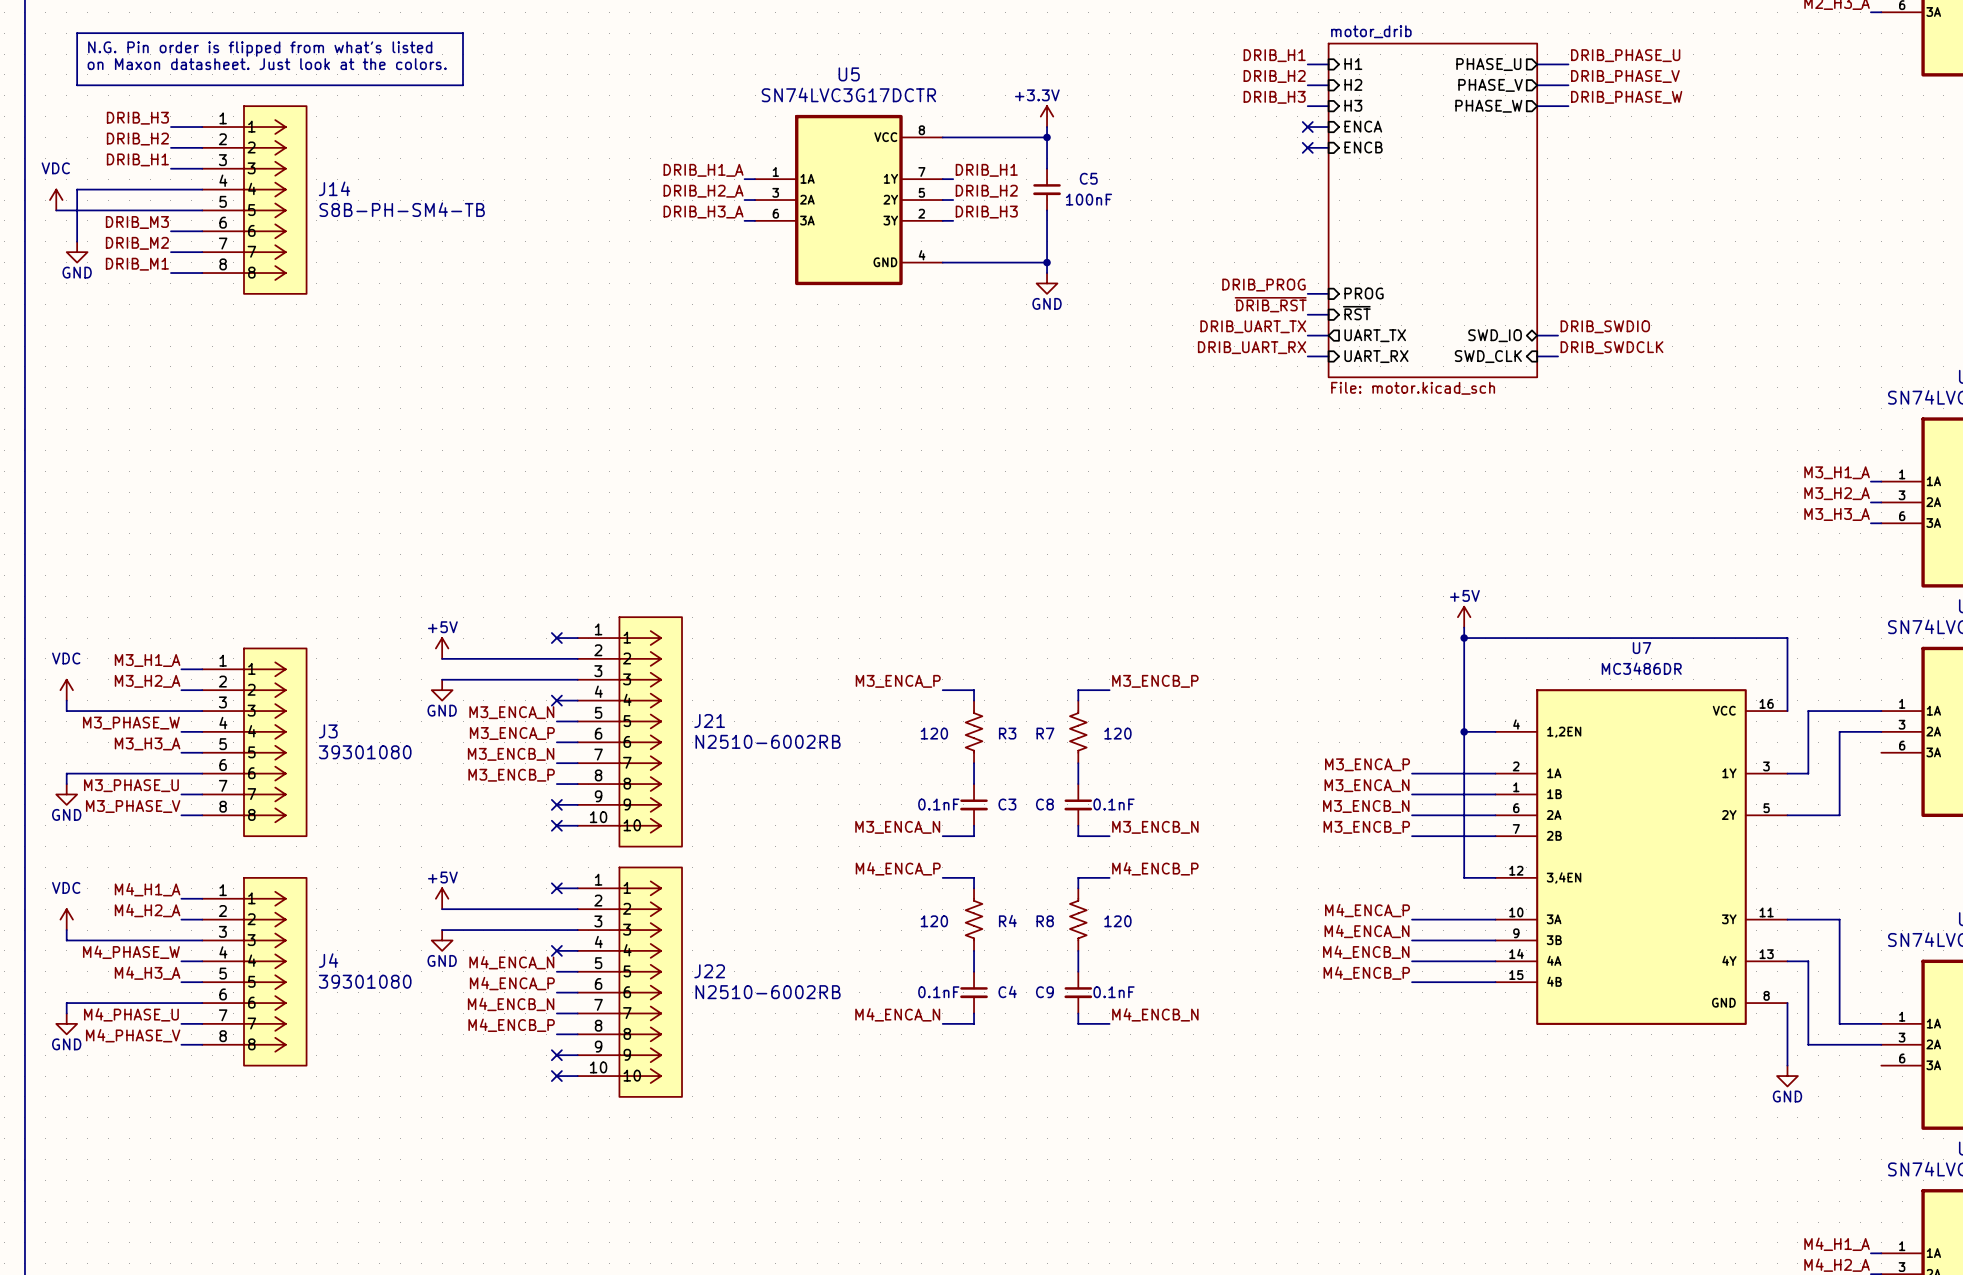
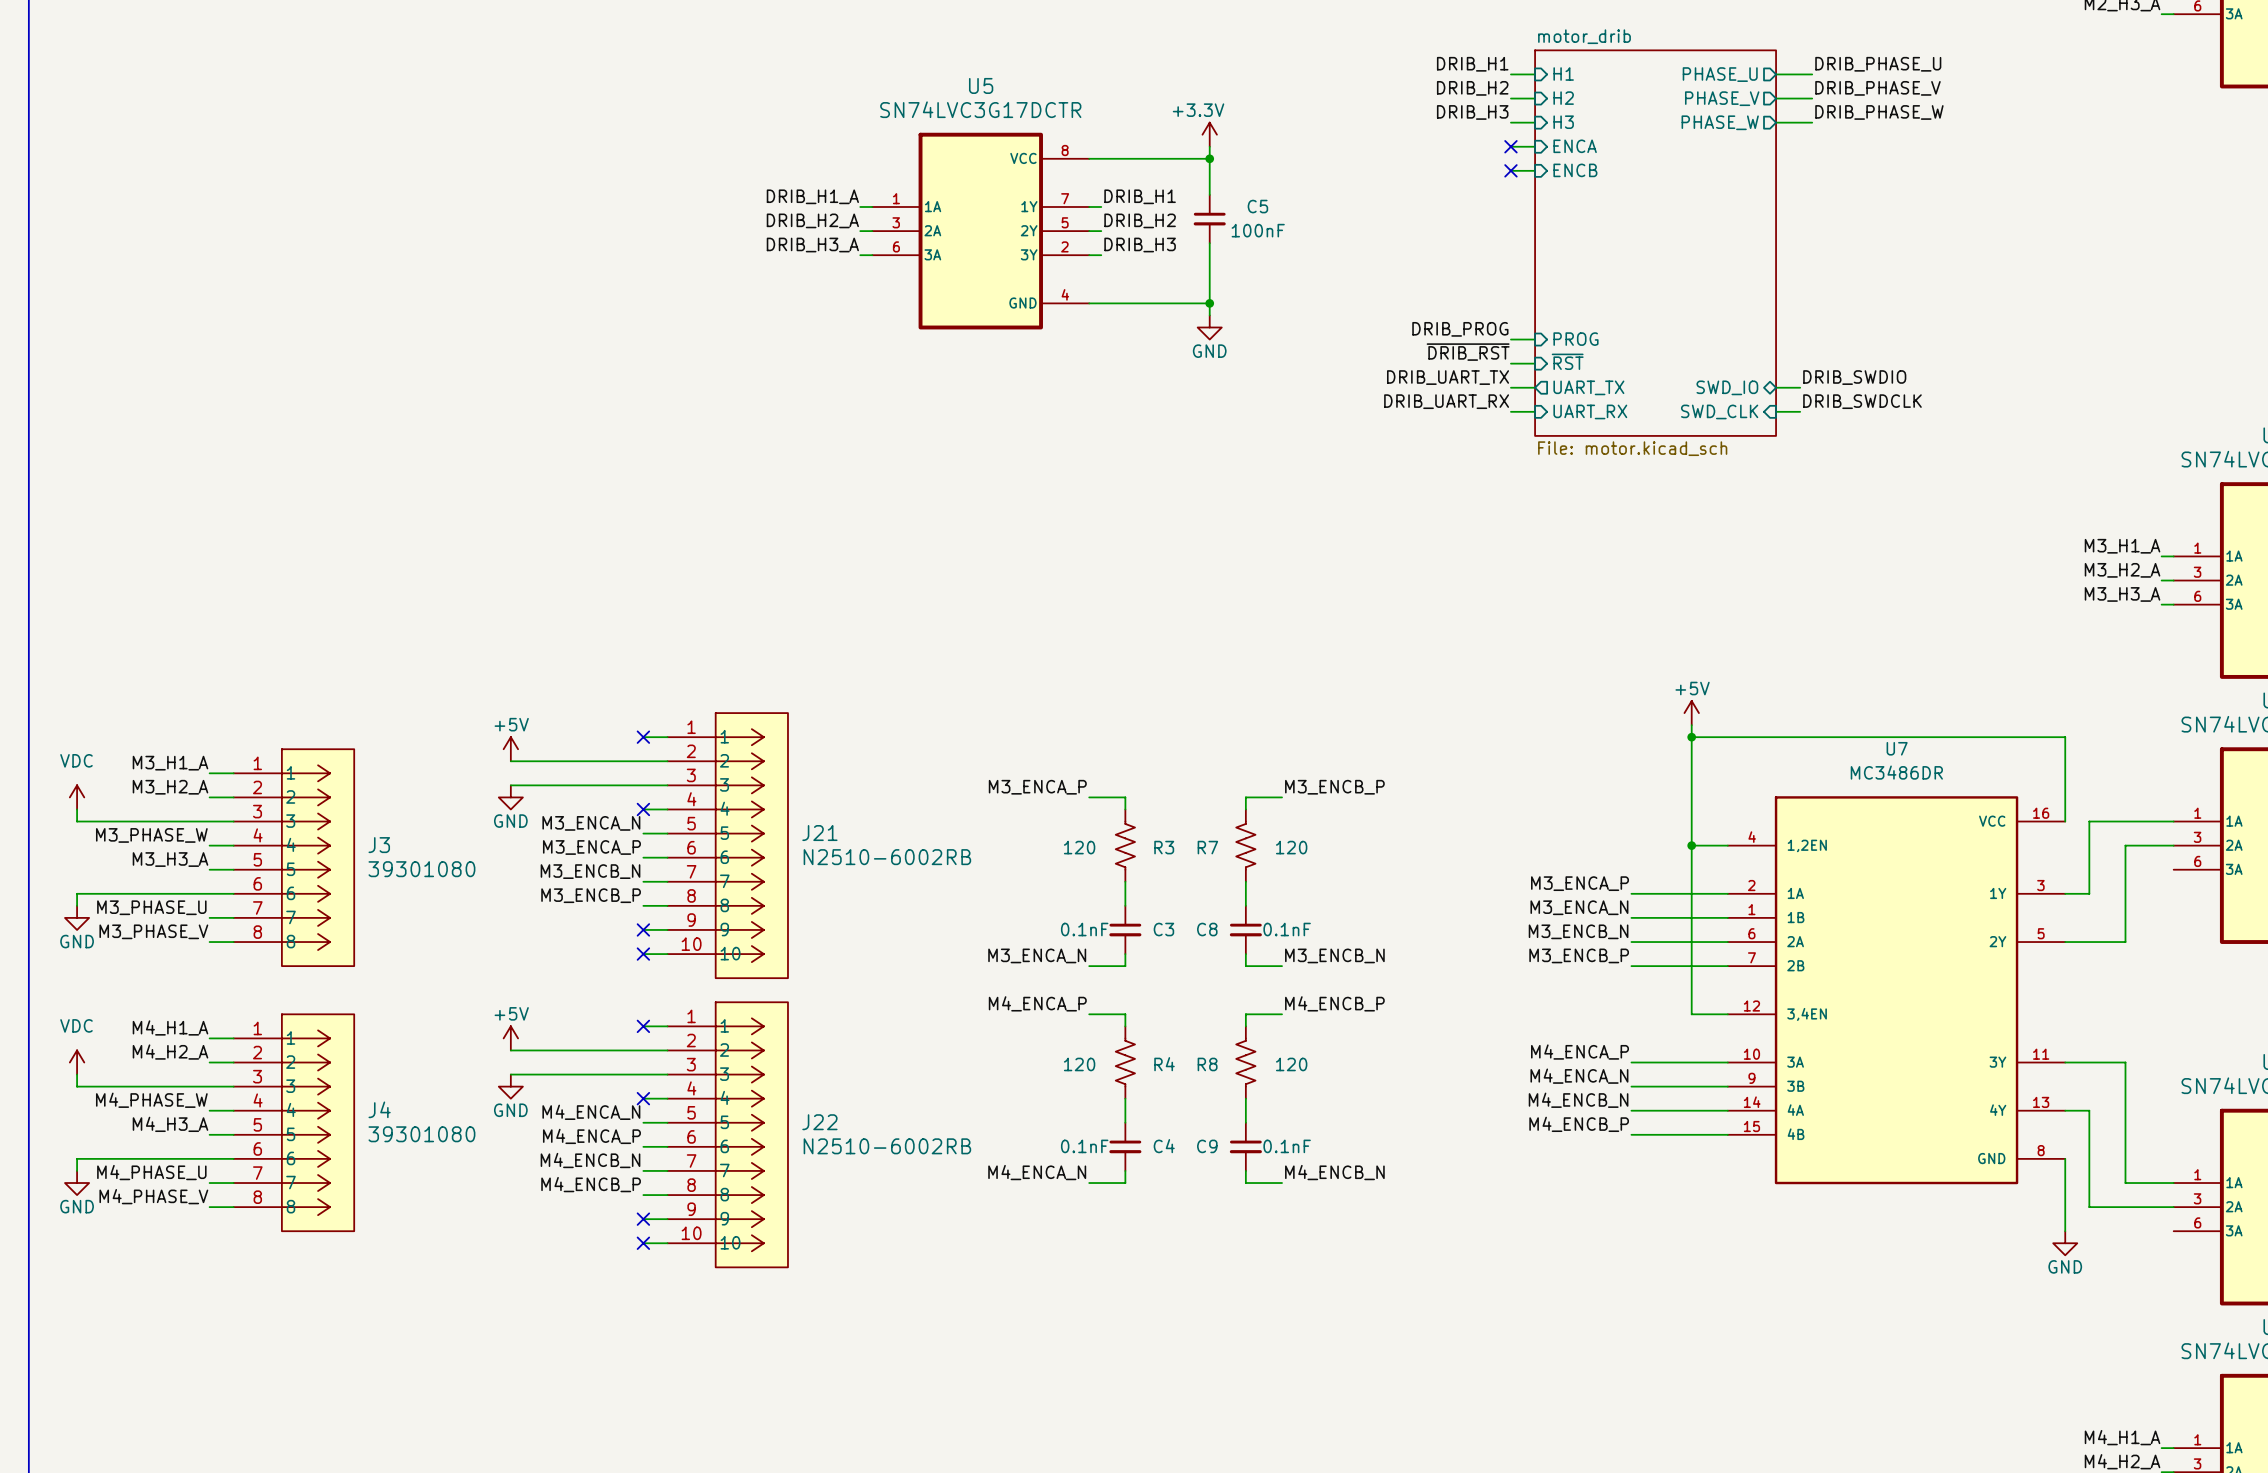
line: (77, 33) (463, 33) (463, 85) (77, 85) (77, 33) -> none
text: N.G. Pin order is flipped from what's listed (260, 49) -> none
text: on Maxon datasheet. Just look at the colors. (267, 64) -> none
label: DRIB_H3 (137, 118) -> none
wire: (170, 127) (202, 127) -> none
label: DRIB_H2 (137, 139) -> none
wire: (170, 147) (202, 147) -> none
label: DRIB_H1 (137, 159) -> none
wire: (170, 168) (202, 168) -> none
wire: (202, 189) (77, 189) (77, 241) -> none
power symbol: VDC (56, 200) -> none
J14: S8B-PH-SM4-TB (254, 200) -> none
wire: (56, 210) (202, 210) -> none
label: DRIB_M3 (137, 222) -> none
wire: (170, 231) (202, 231) -> none
label: DRIB_M2 (137, 243) -> none
power symbol: GND (77, 252) -> none
wire: (170, 252) (202, 252) -> none
label: DRIB_M1 (137, 264) -> none
wire: (170, 273) (202, 273) -> none

